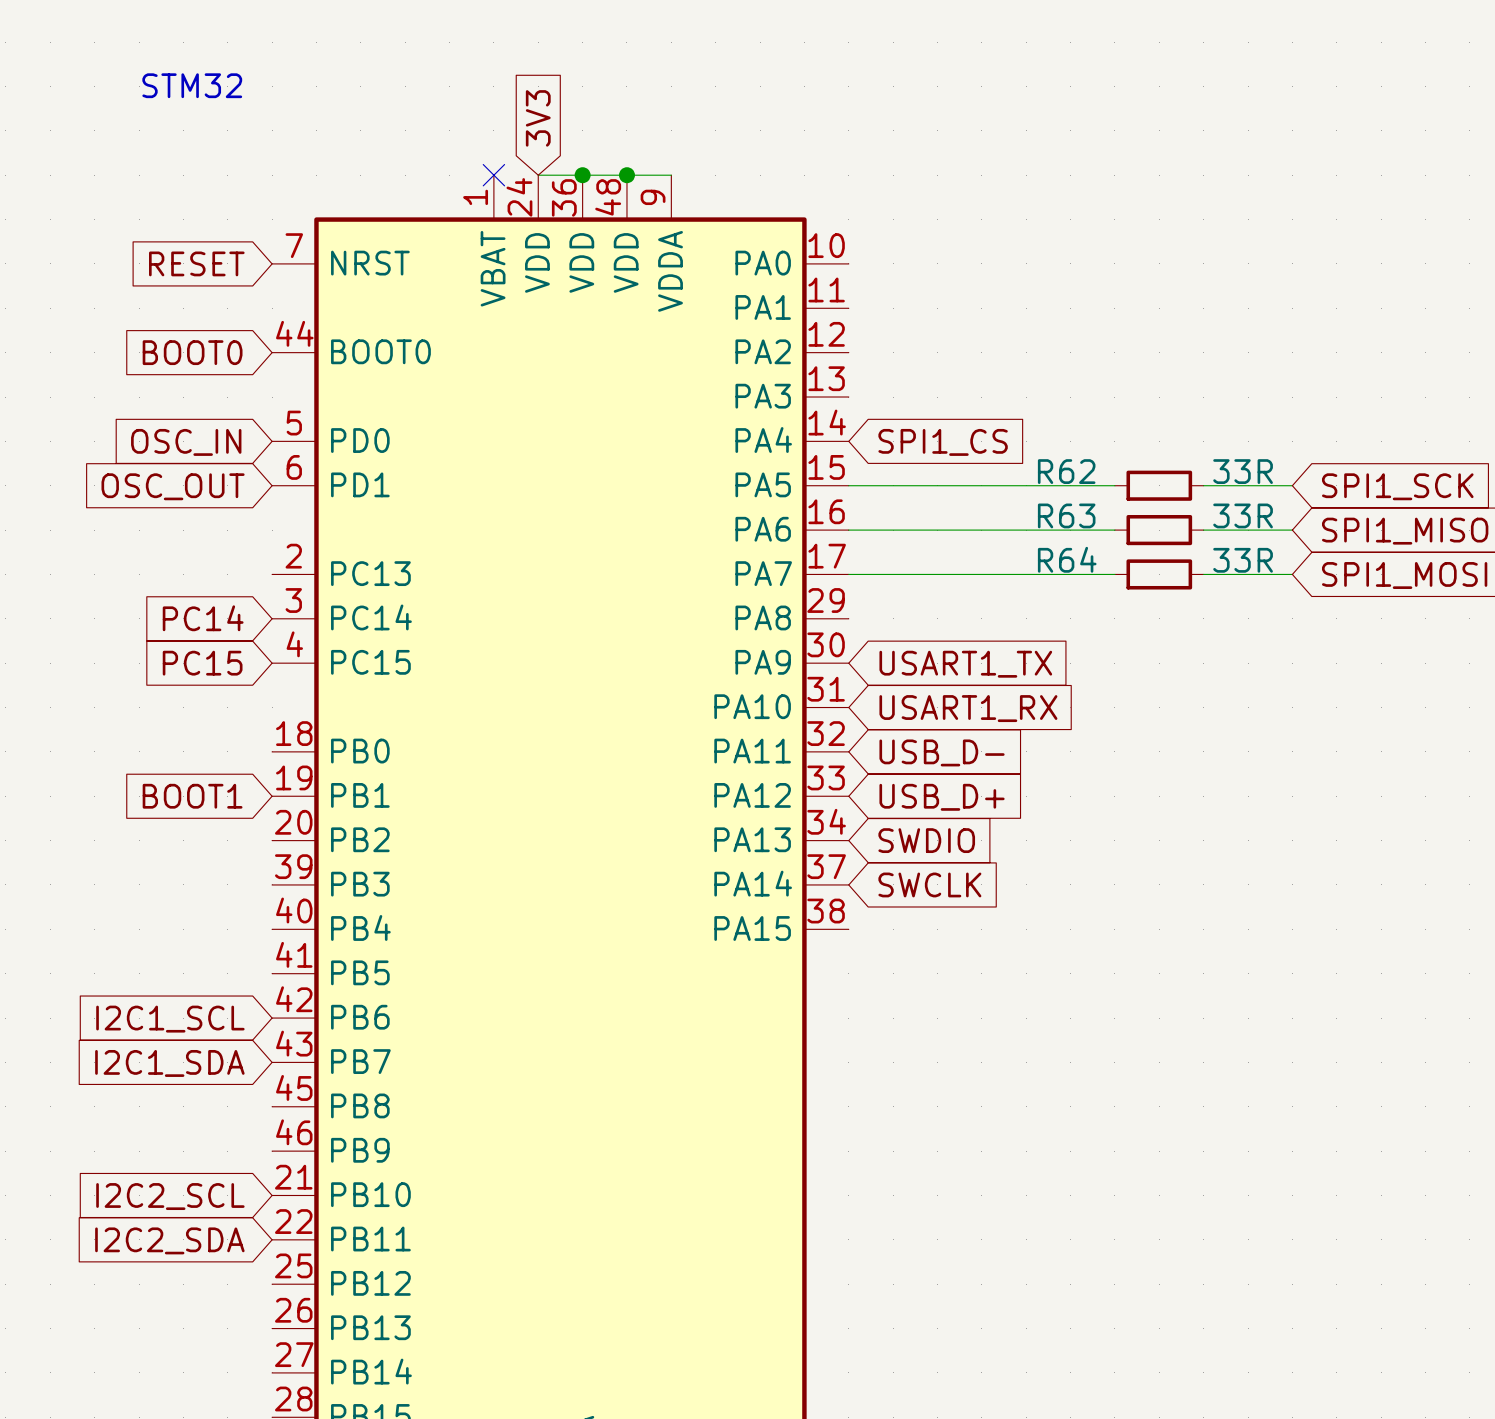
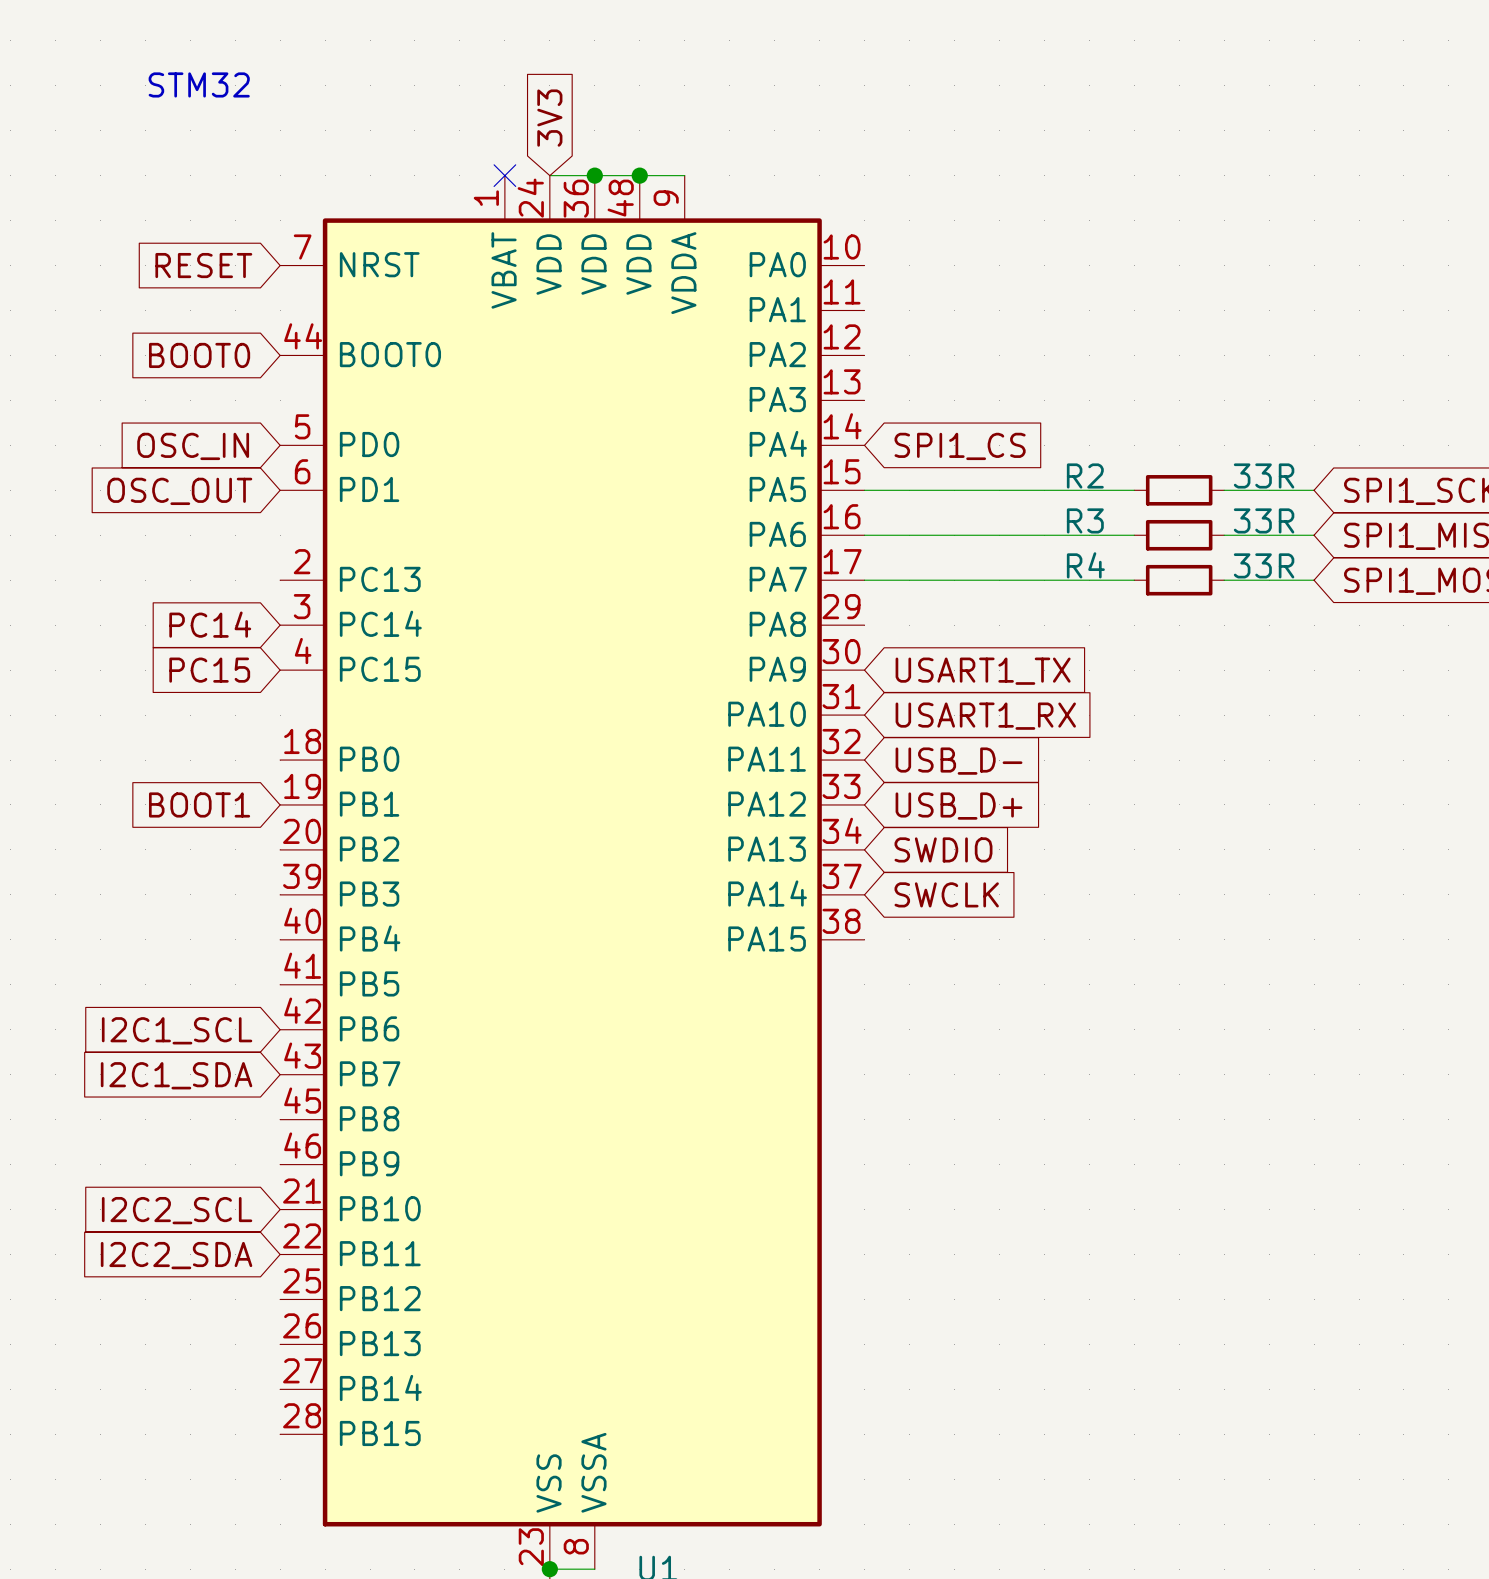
R62 name: R62 (1066, 471) -> R2 (1085, 475)
R63 name: R63 (1066, 515) -> R3 (1085, 520)
R64 name: R64 (1067, 559) -> R4 (1085, 565)

